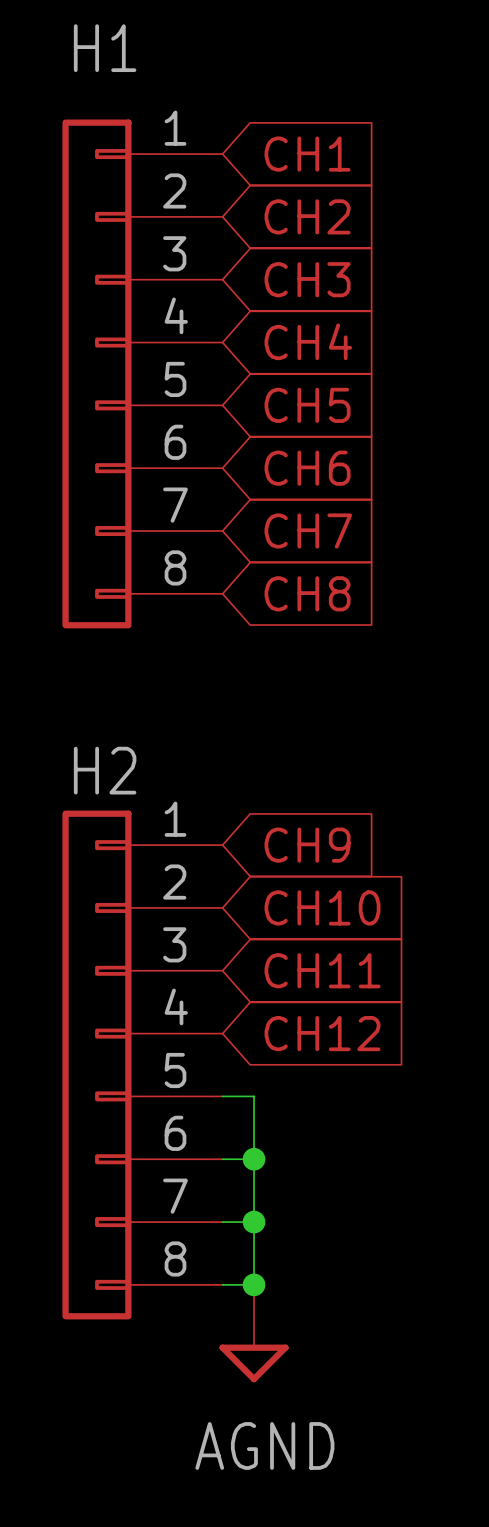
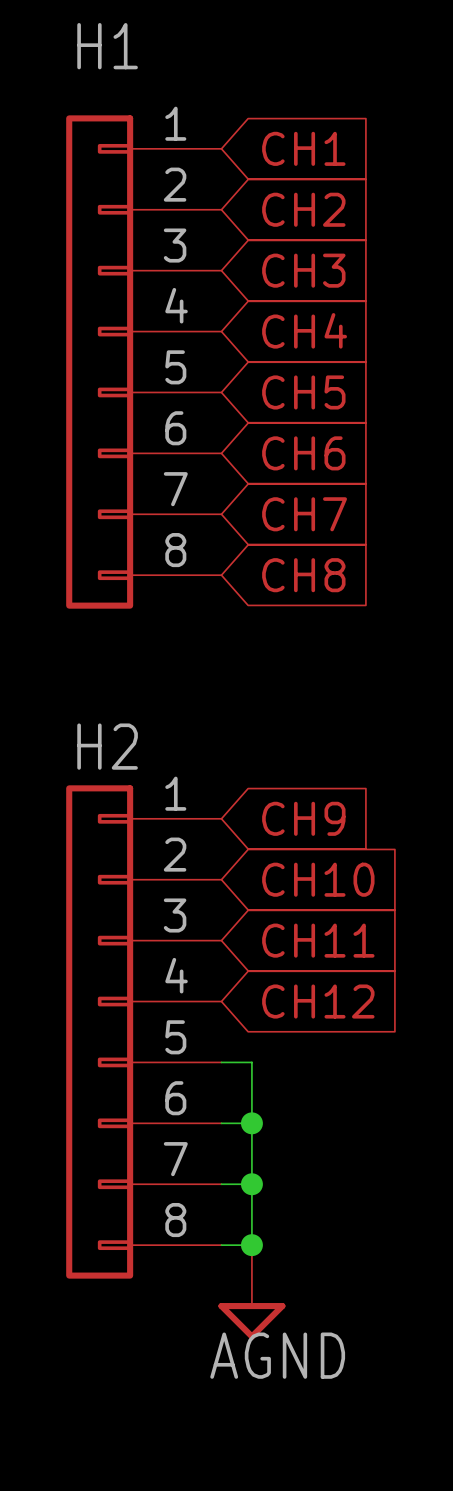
power symbol text position: AGND (264, 1445) -> AGND (277, 1355)

